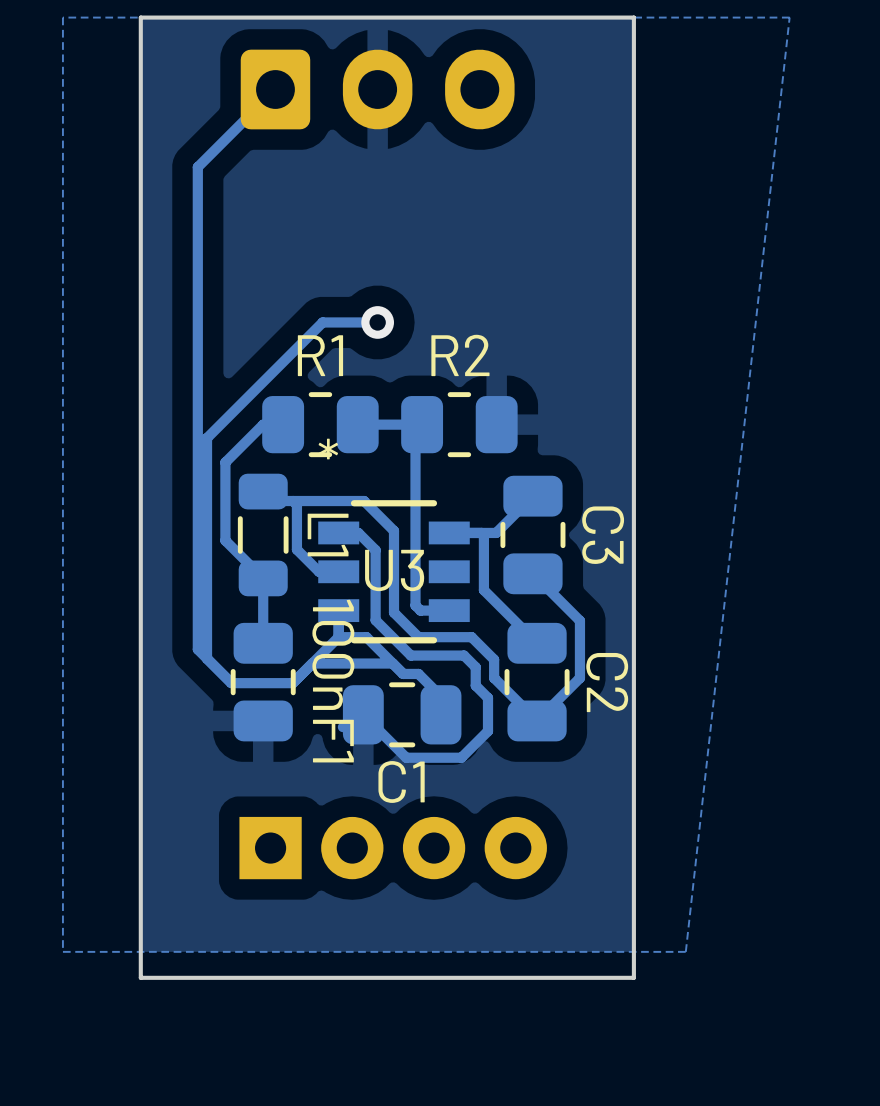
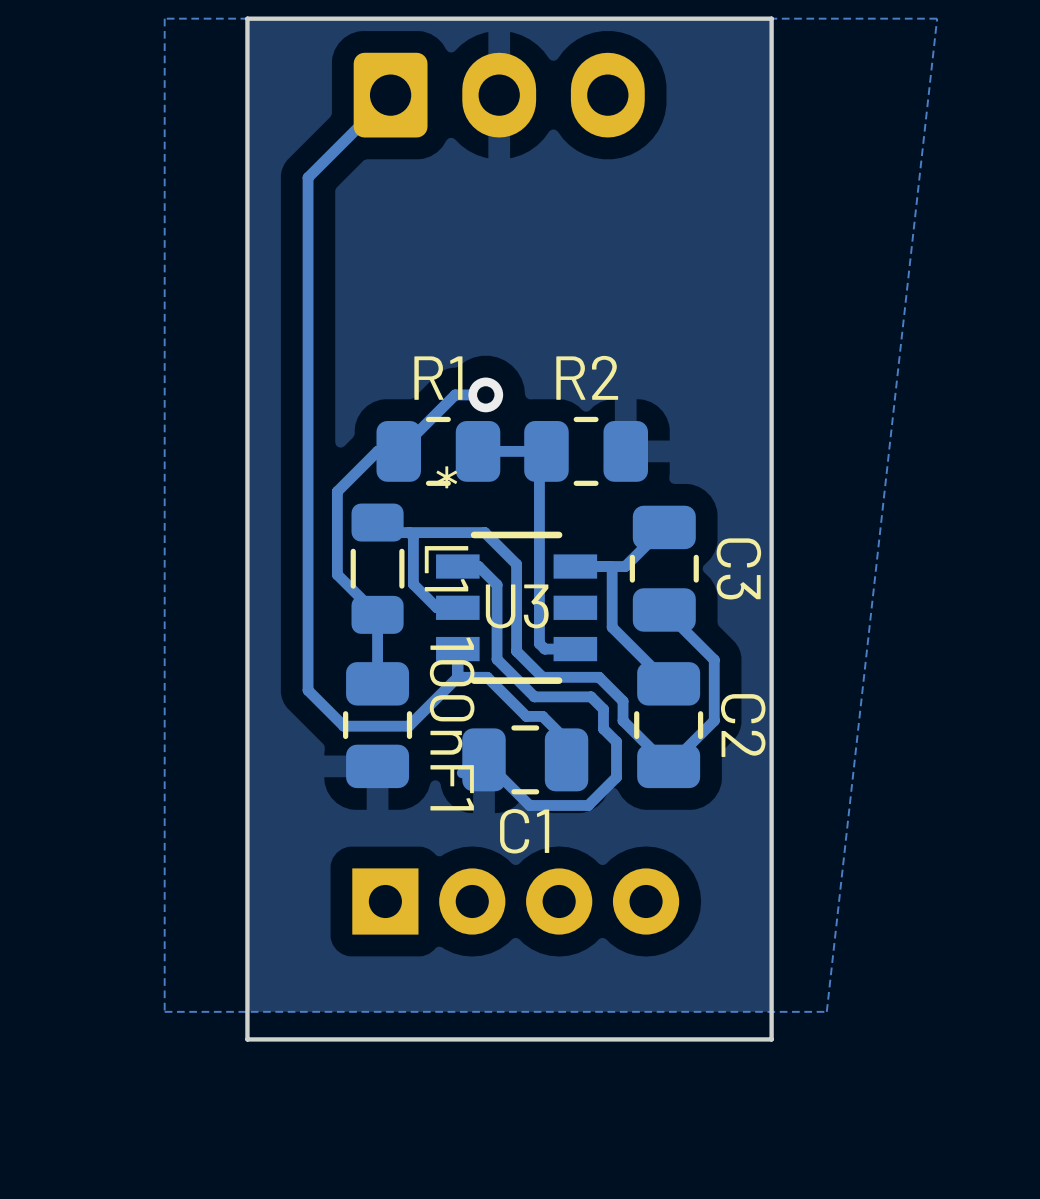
track: (377, 322) (322, 322) (207, 438) (207, 658) -> none
via position: (377, 322) -> (485, 394)
track: none -> (485, 394) (455, 394) (398, 451)
track: (392, 663) (312, 663) -> none

